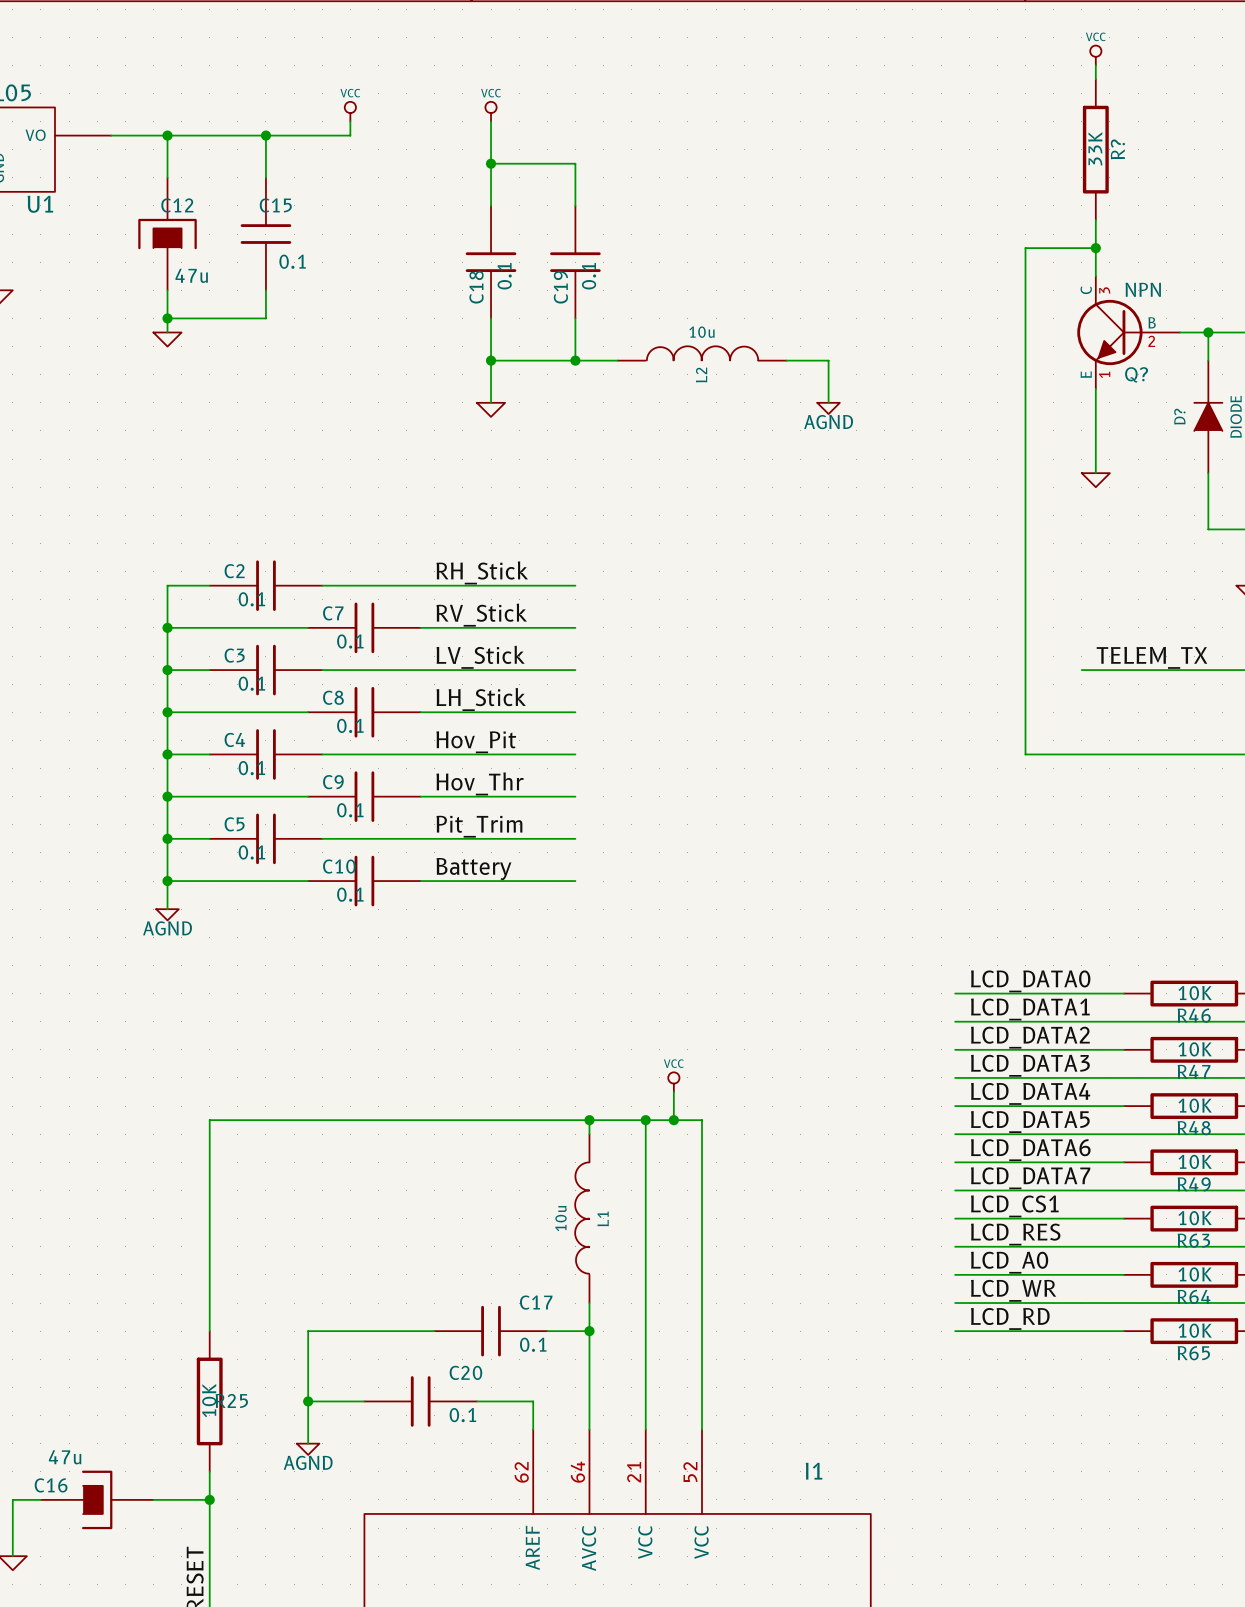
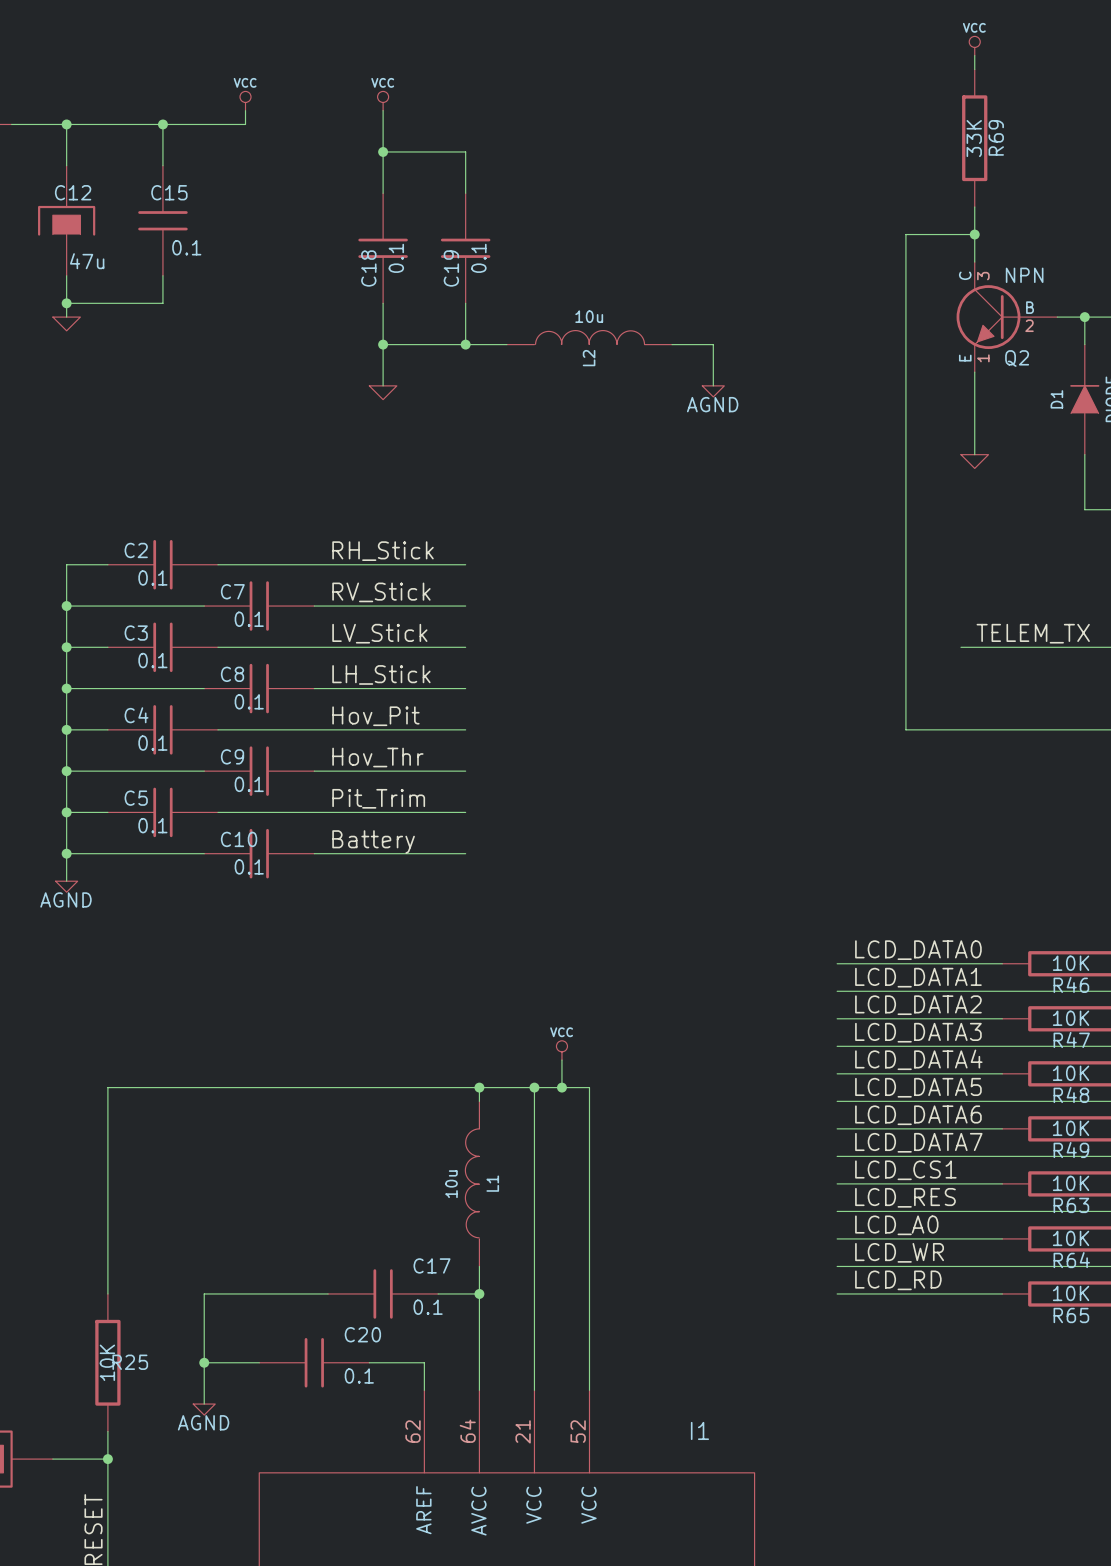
R? name: R? (1117, 149) -> R69 (996, 137)
Q? name: Q? (1136, 374) -> Q2 (1017, 358)
D? name: D? (1179, 416) -> D1 (1056, 399)

